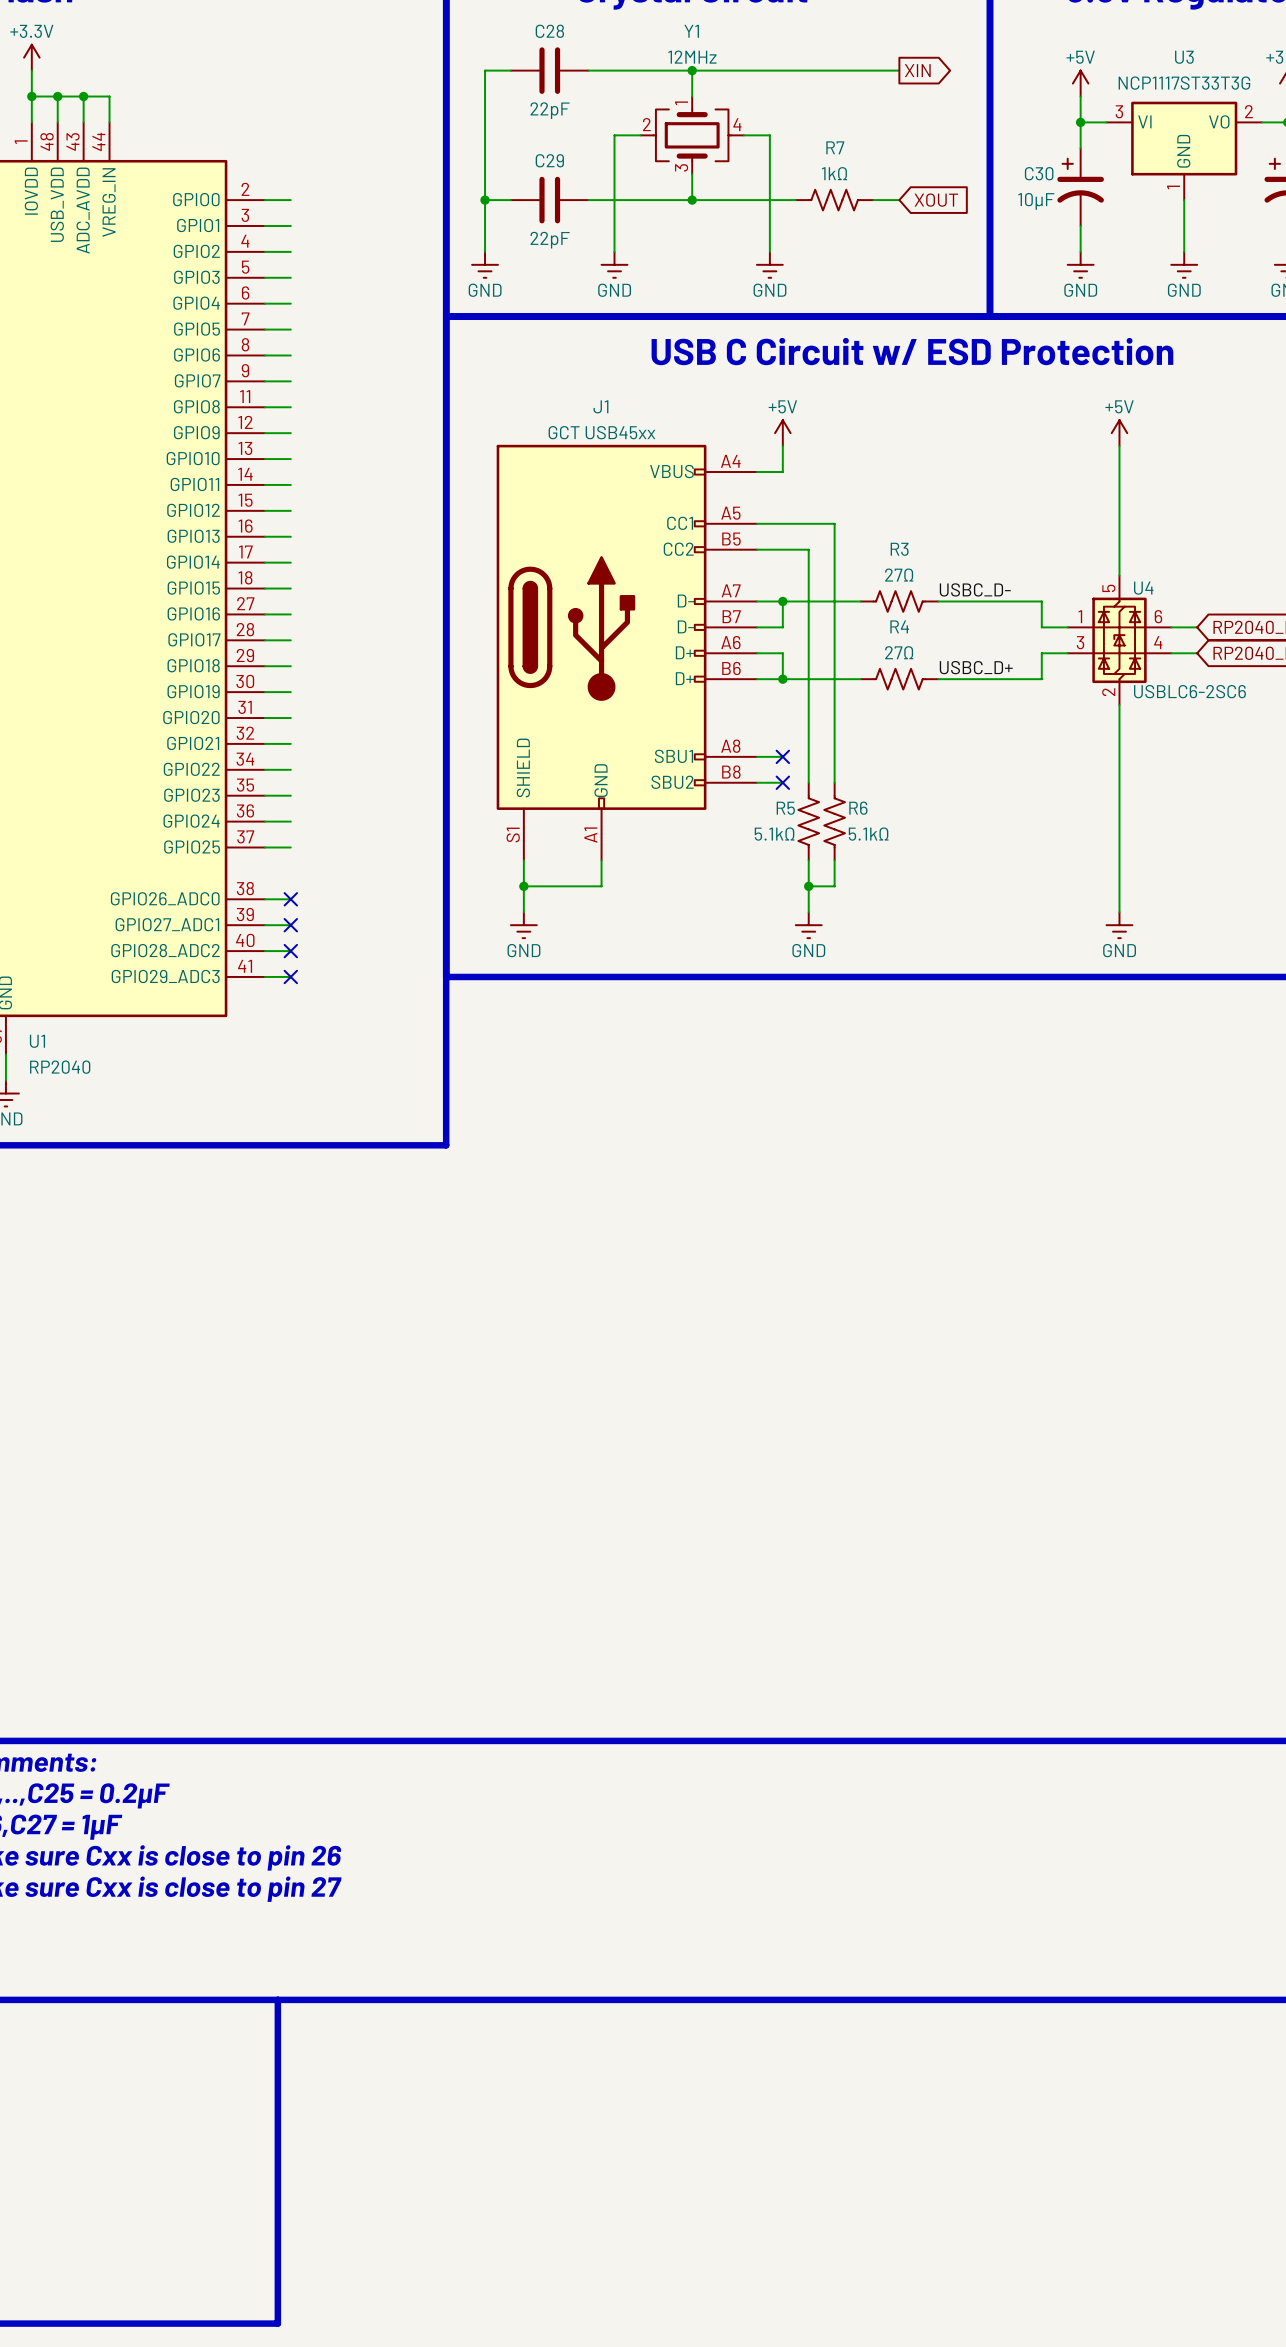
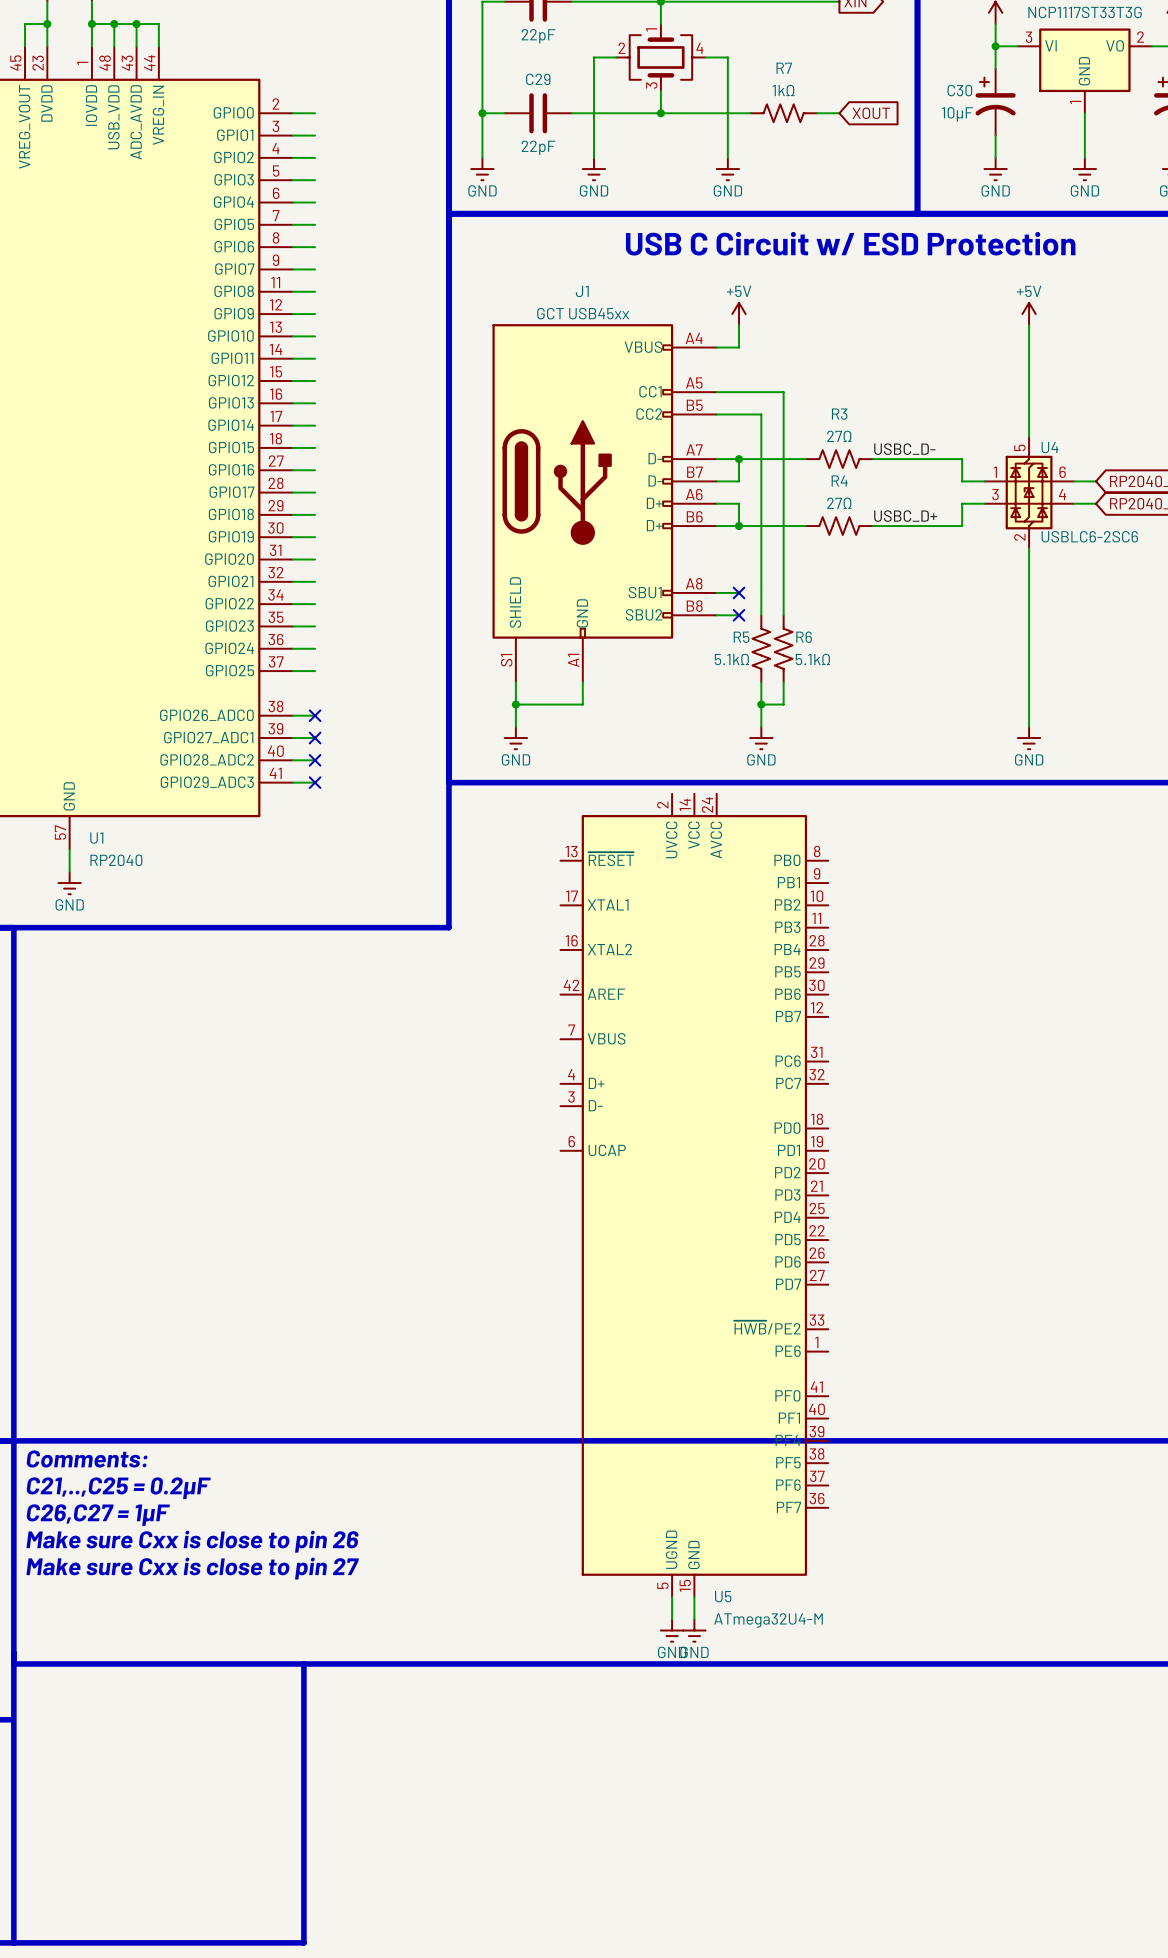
U5: none -> ATmega32U4-M (694, 1195)
wire: none -> (672, 1597) (672, 1619)
wire: none -> (694, 1597) (694, 1619)
power symbol: none -> GND (672, 1630)
power symbol: none -> GND (694, 1630)

